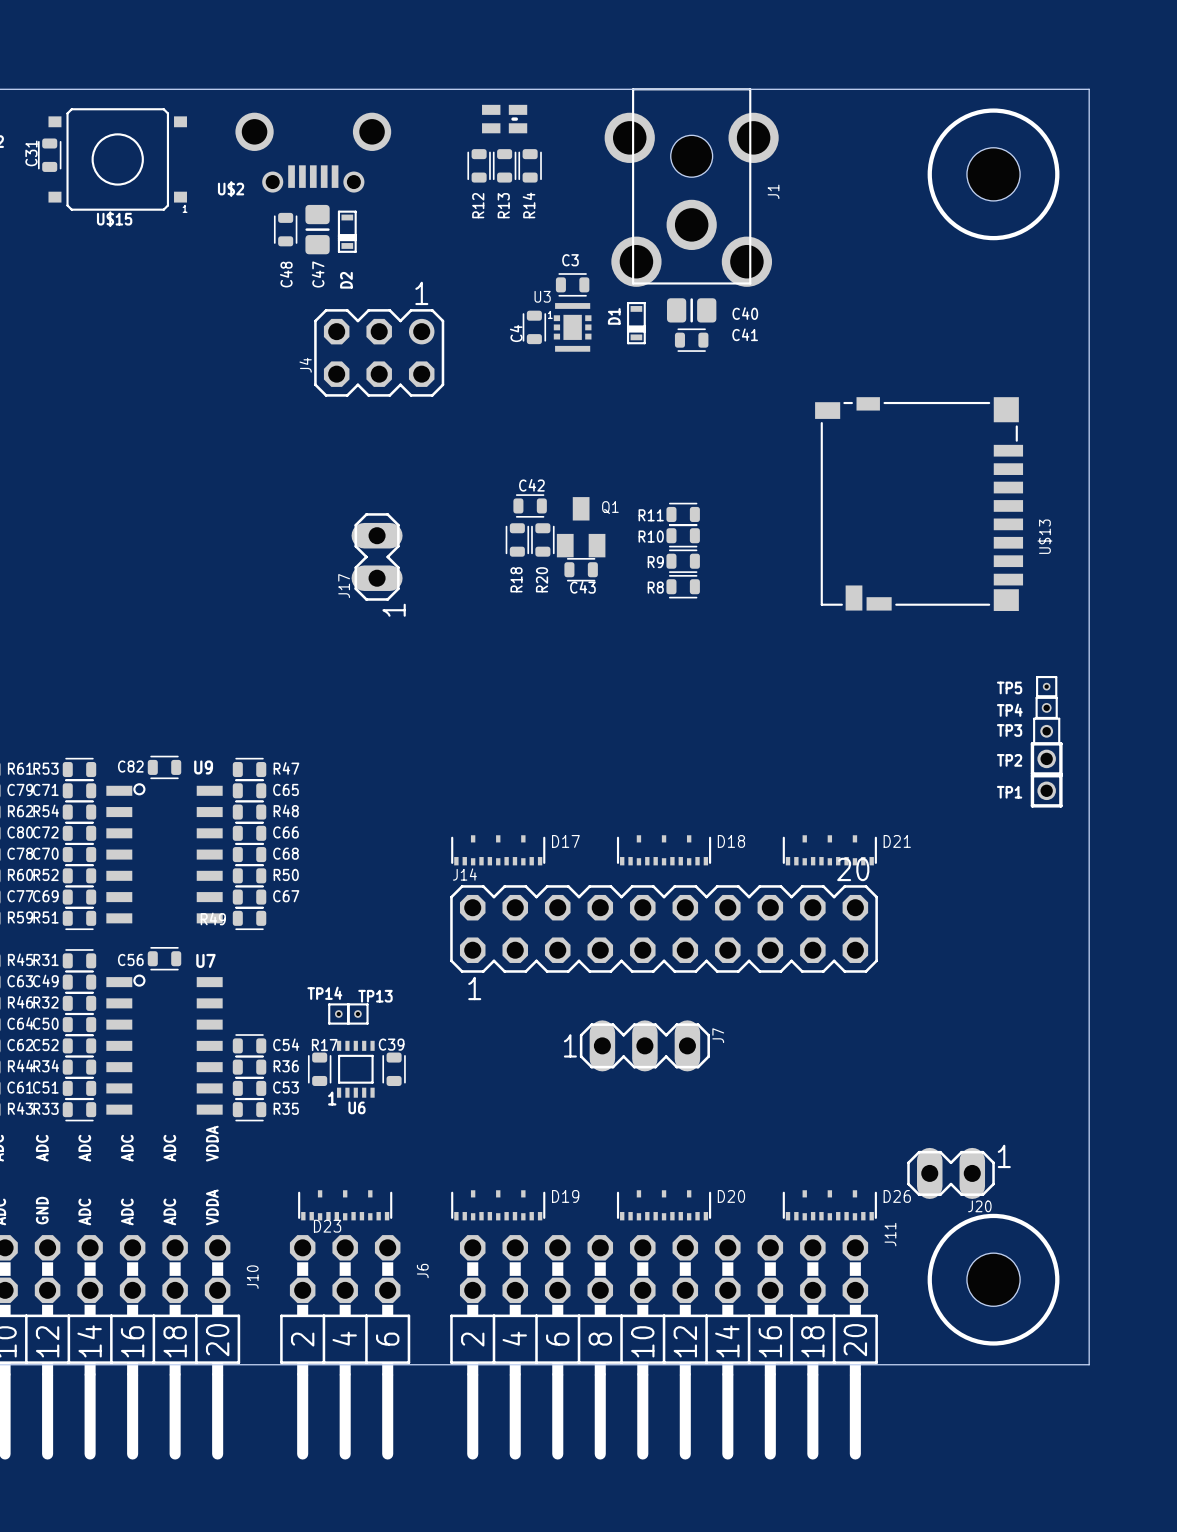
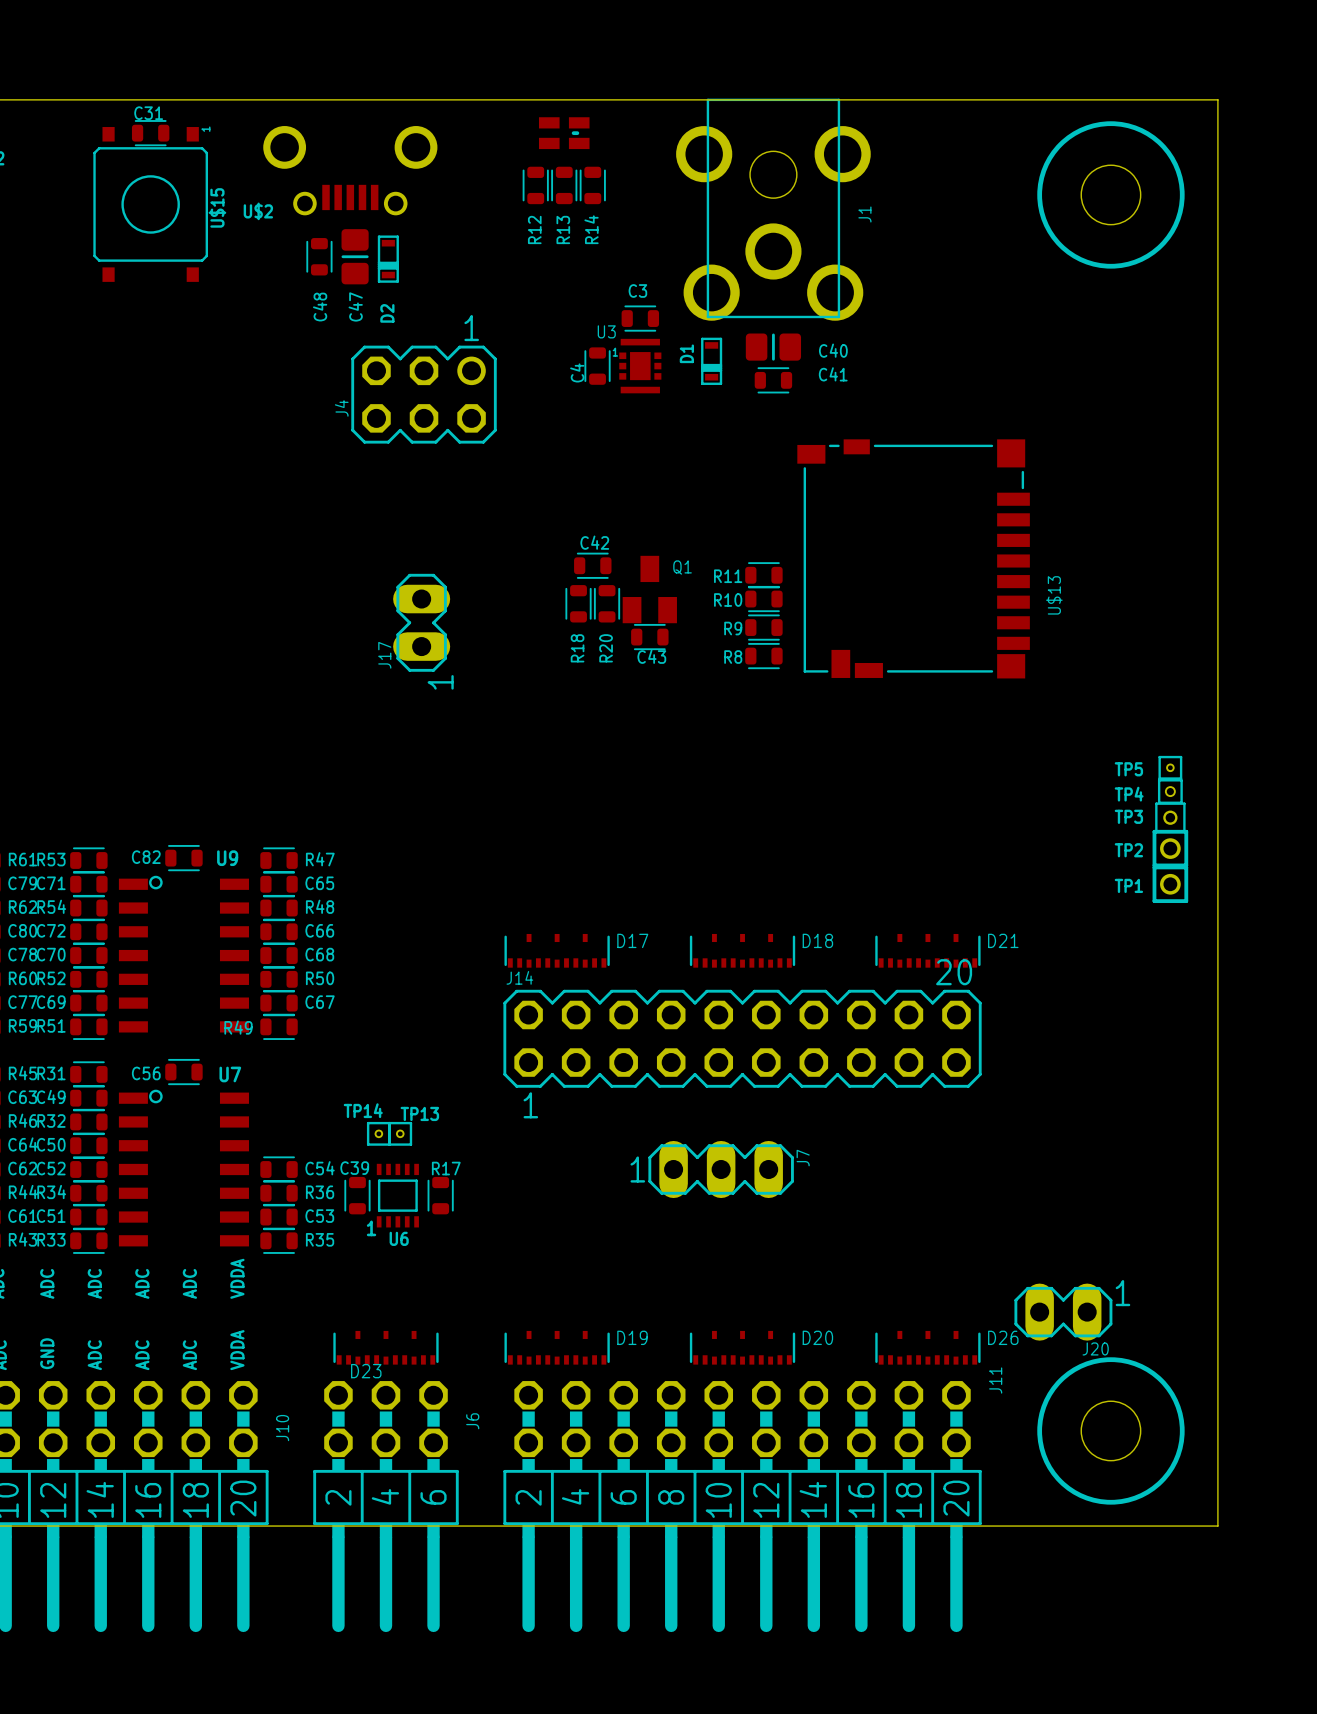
C31 rotation: 0° (49, 155) -> 90° clockwise (150, 133)
C31 position: (49, 155) -> (150, 133)
U$15 rotation: 0° (117, 159) -> 90° counterclockwise (150, 204)
U$13 position: (919, 504) -> (913, 558)
C39 name: C39 (391, 1044) -> R17 (446, 1168)
R17 name: R17 (324, 1045) -> C39 (354, 1168)

